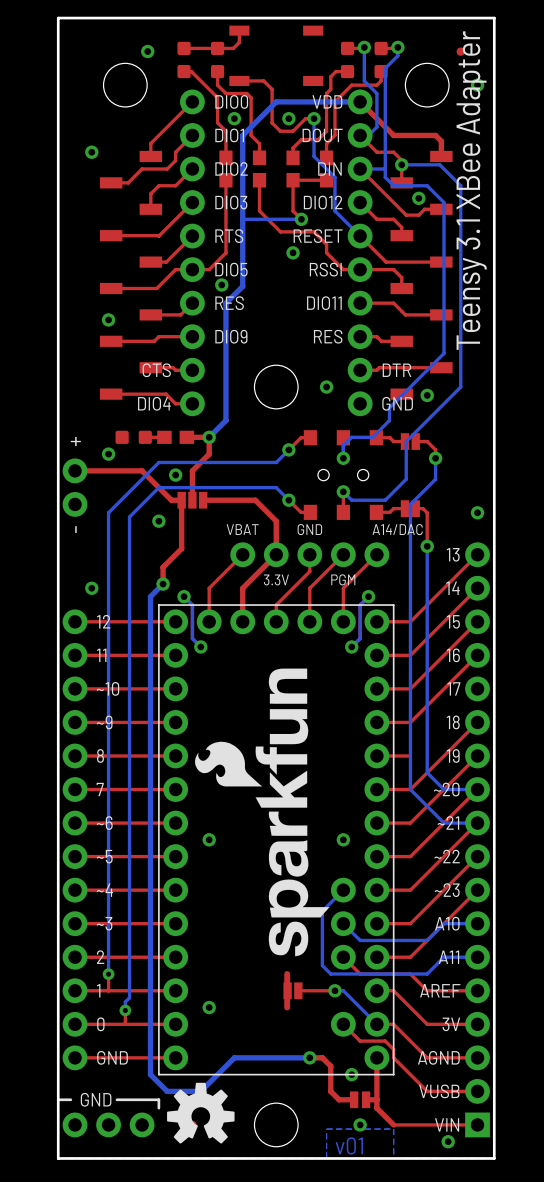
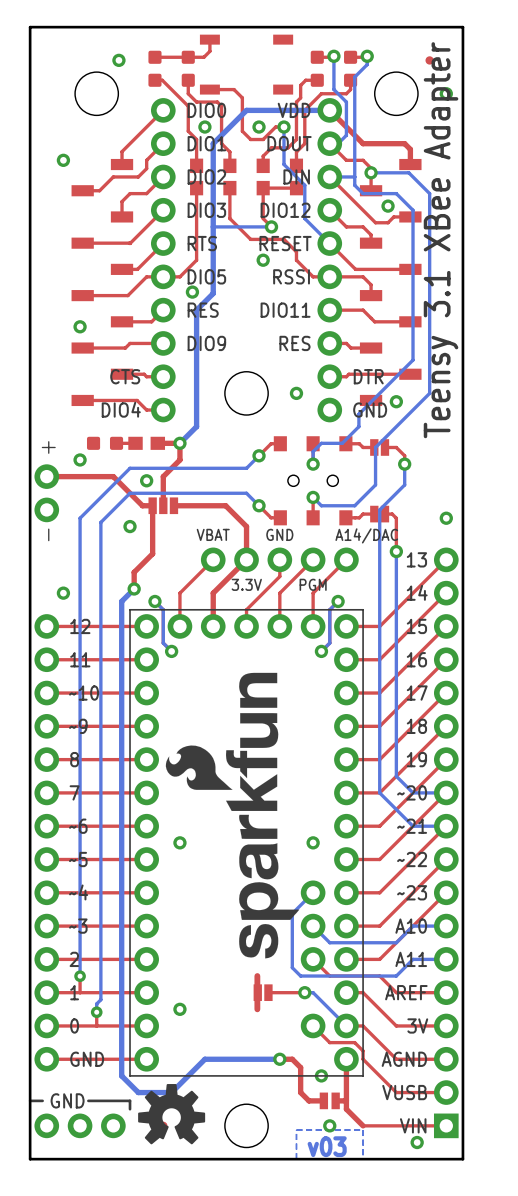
top track: none -> (446, 693) (379, 759)
text: v01 (349, 1145) -> v03 (327, 1146)

